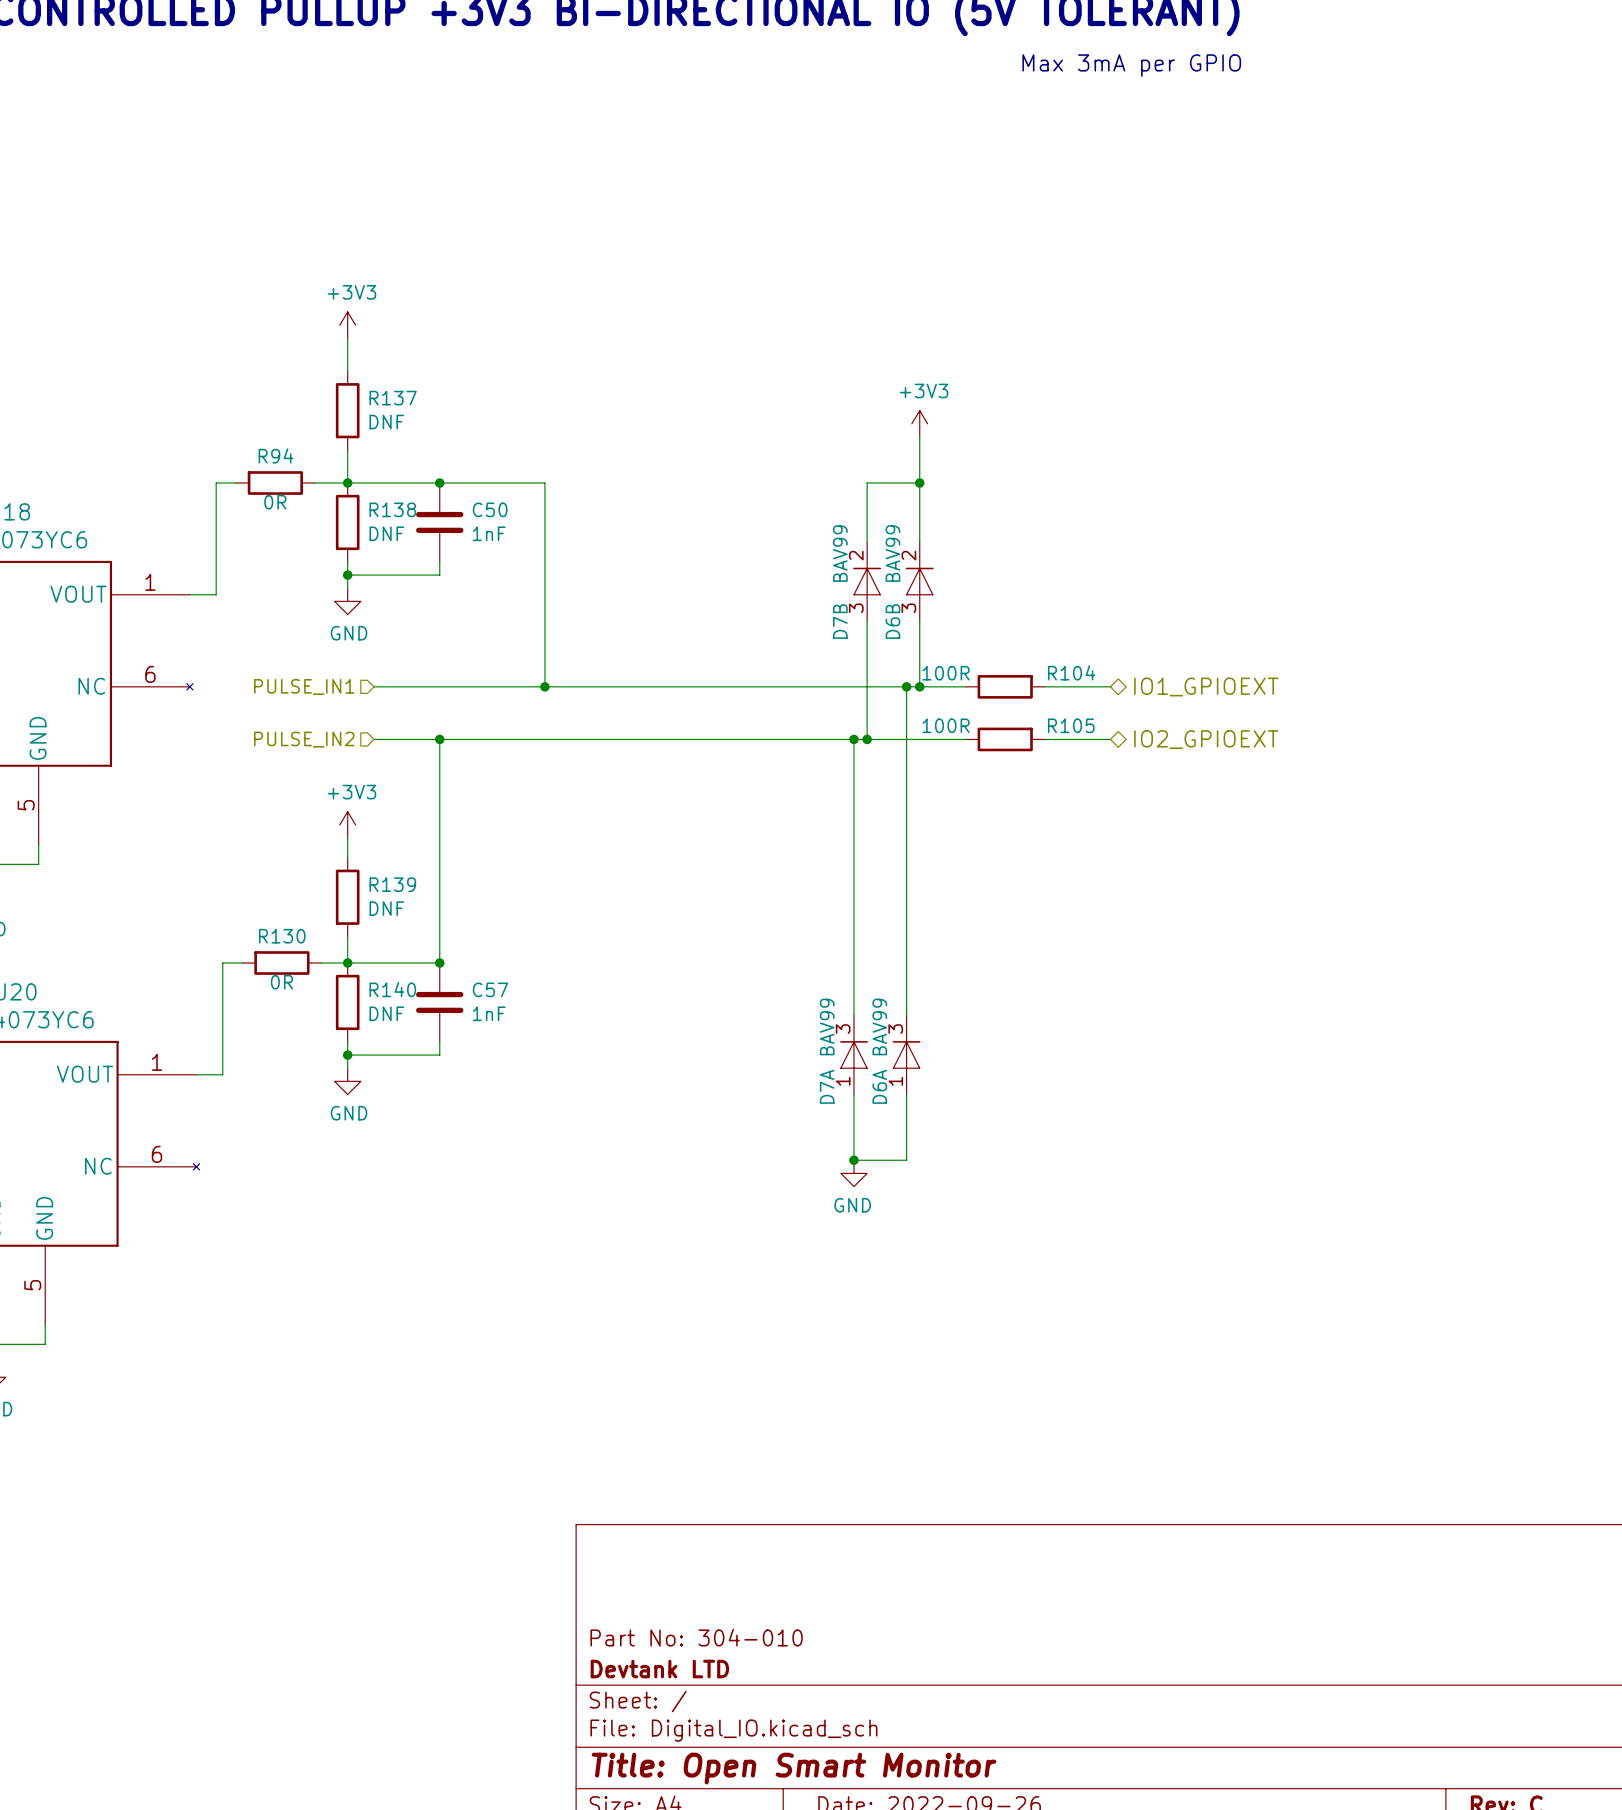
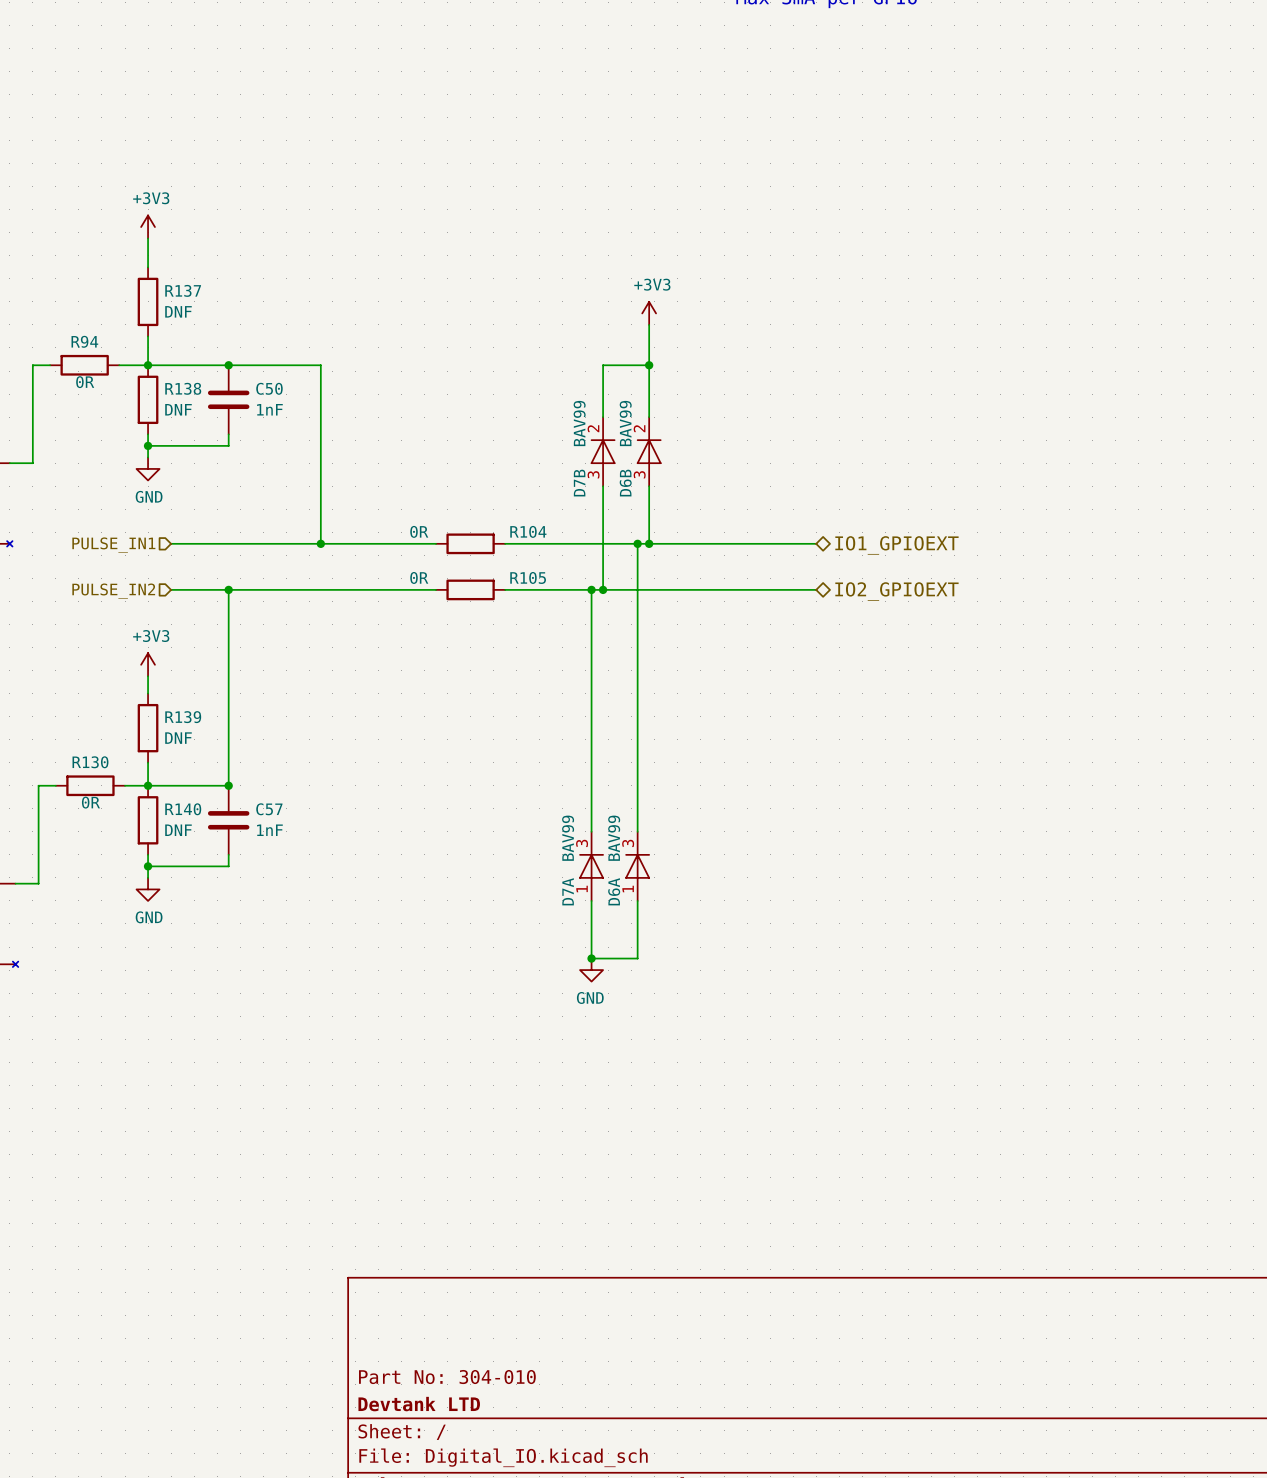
R104 value: 100R (946, 673) -> 0R (419, 531)
wire: (676, 686) (755, 686) -> none
wire: none -> (689, 543) (758, 543)
R104 position: (1005, 686) -> (470, 543)
R105 value: 100R (946, 725) -> 0R (419, 577)
wire: (676, 739) (755, 739) -> none
wire: none -> (689, 589) (758, 589)
R105 position: (1005, 739) -> (470, 589)

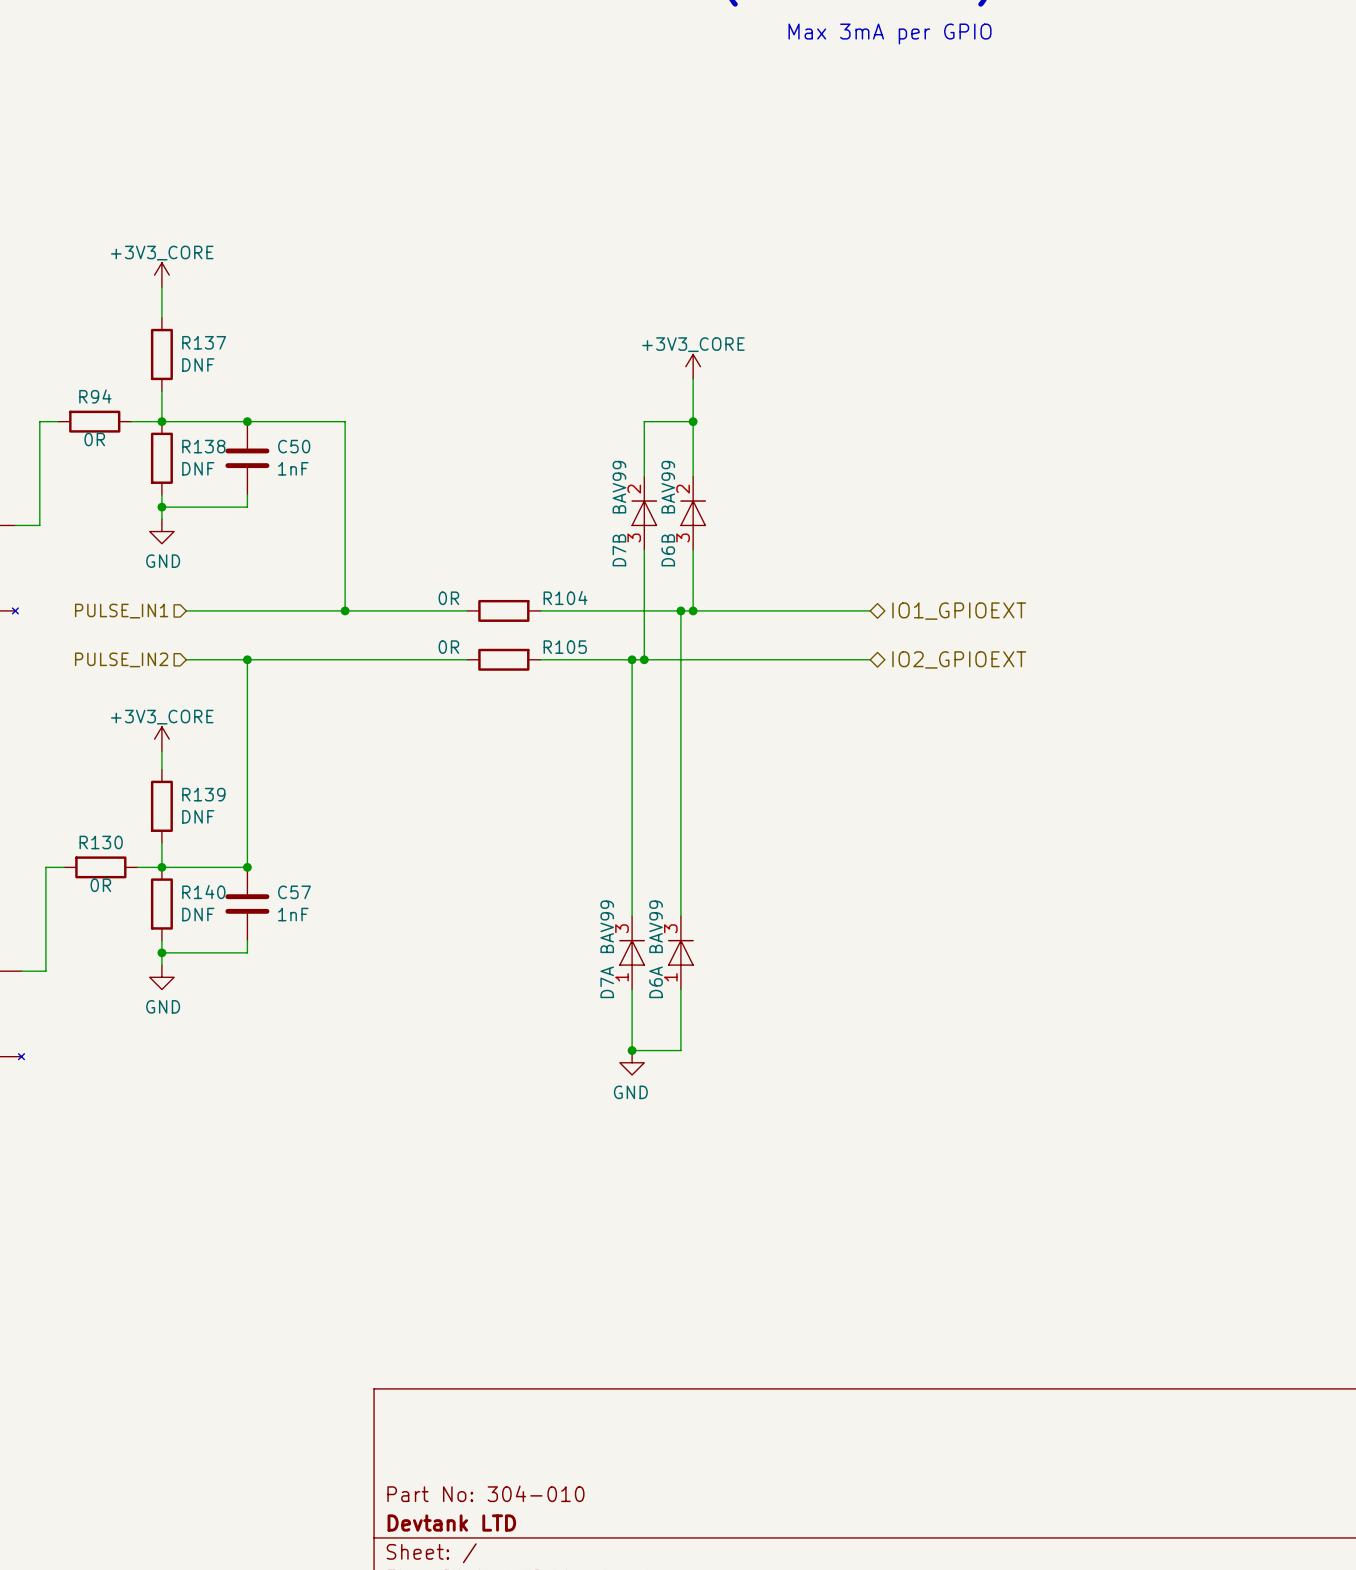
power symbol: +3V3 (148, 227) -> +3V3_CORE (161, 275)
power symbol: +3V3 (649, 313) -> +3V3_CORE (693, 366)
power symbol: +3V3 (148, 664) -> +3V3_CORE (161, 739)

